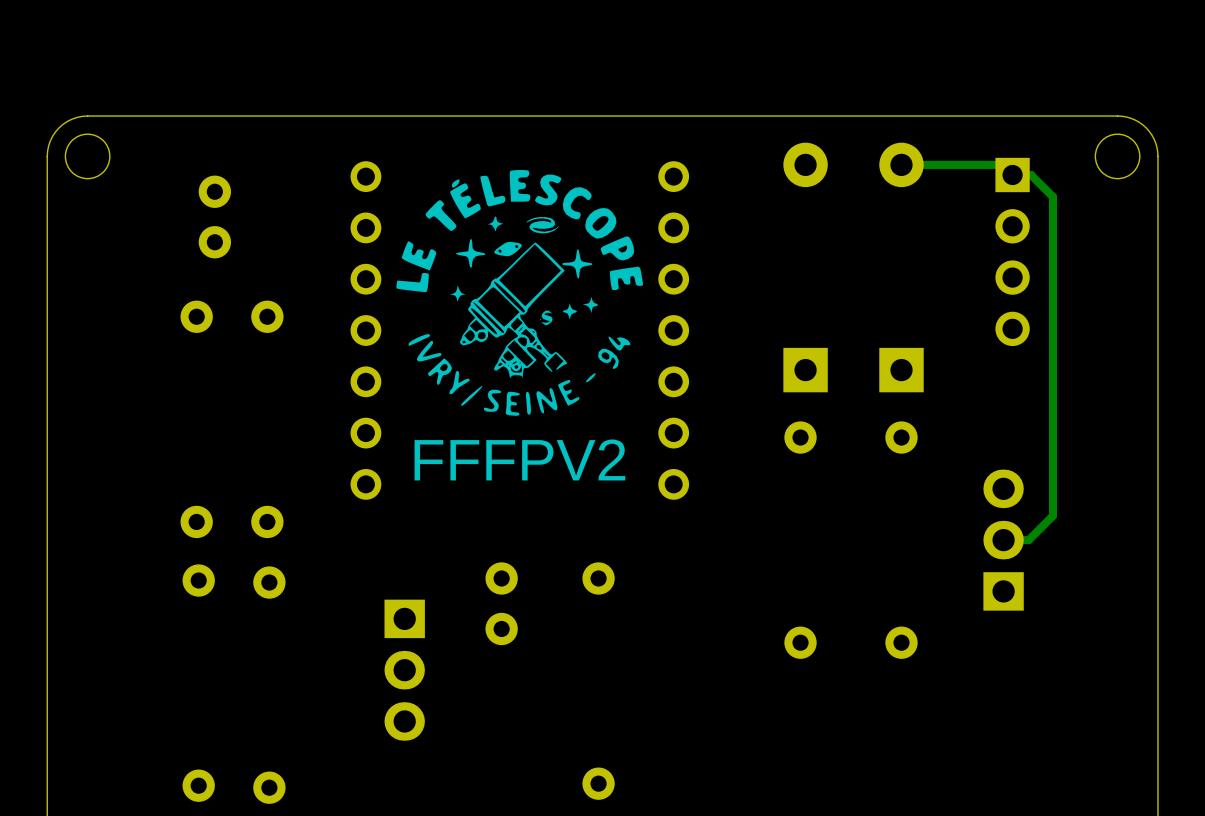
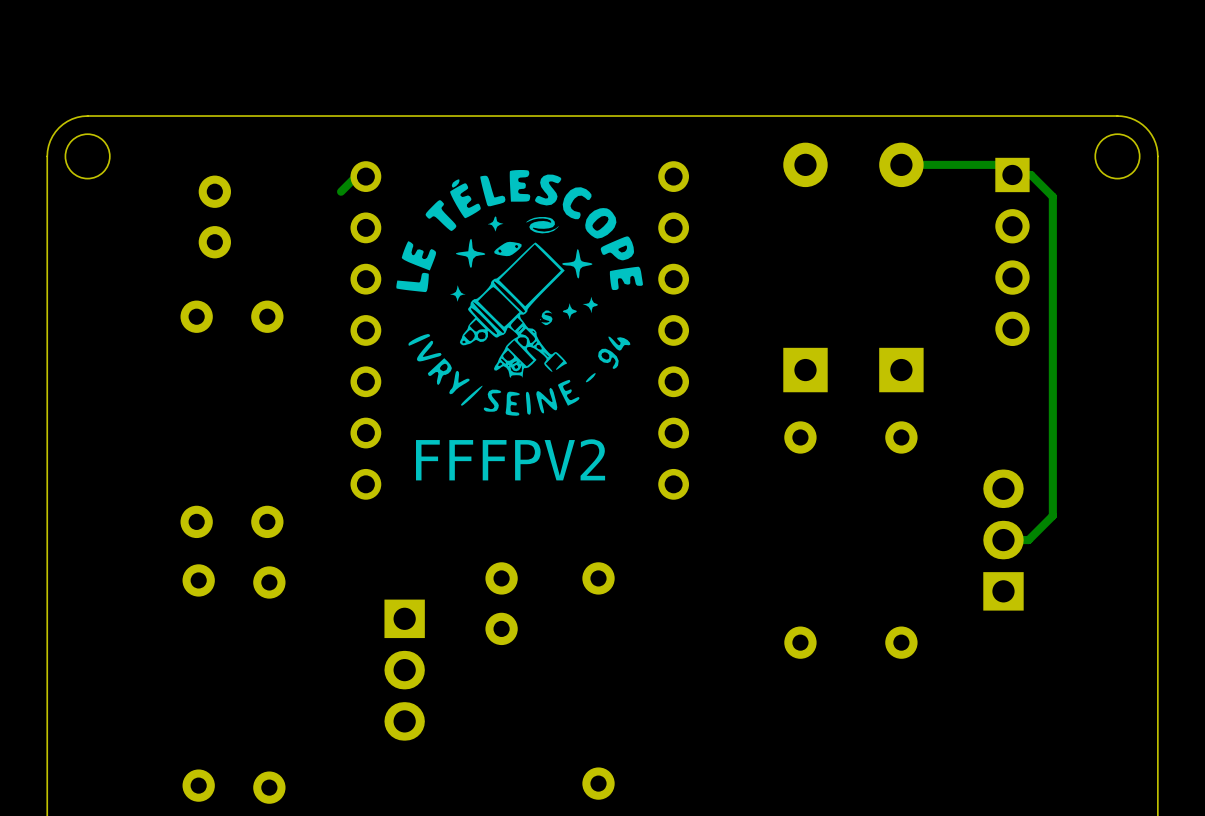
track: none -> (356, 176) (341, 191)

